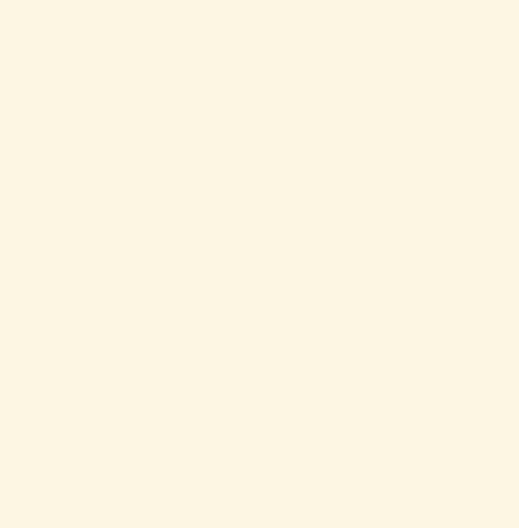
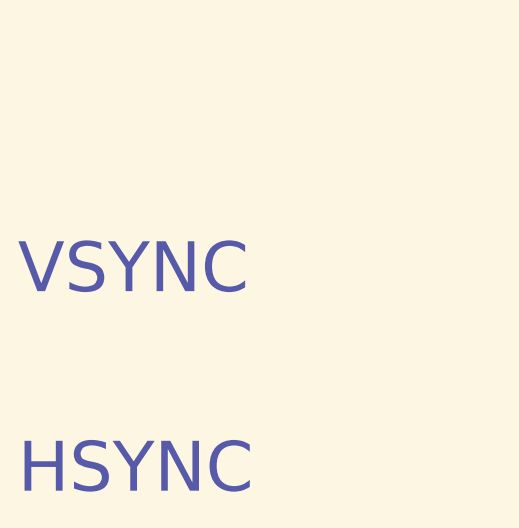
text: none -> VSYNC (131, 266)
text: none -> HSYNC (137, 465)

